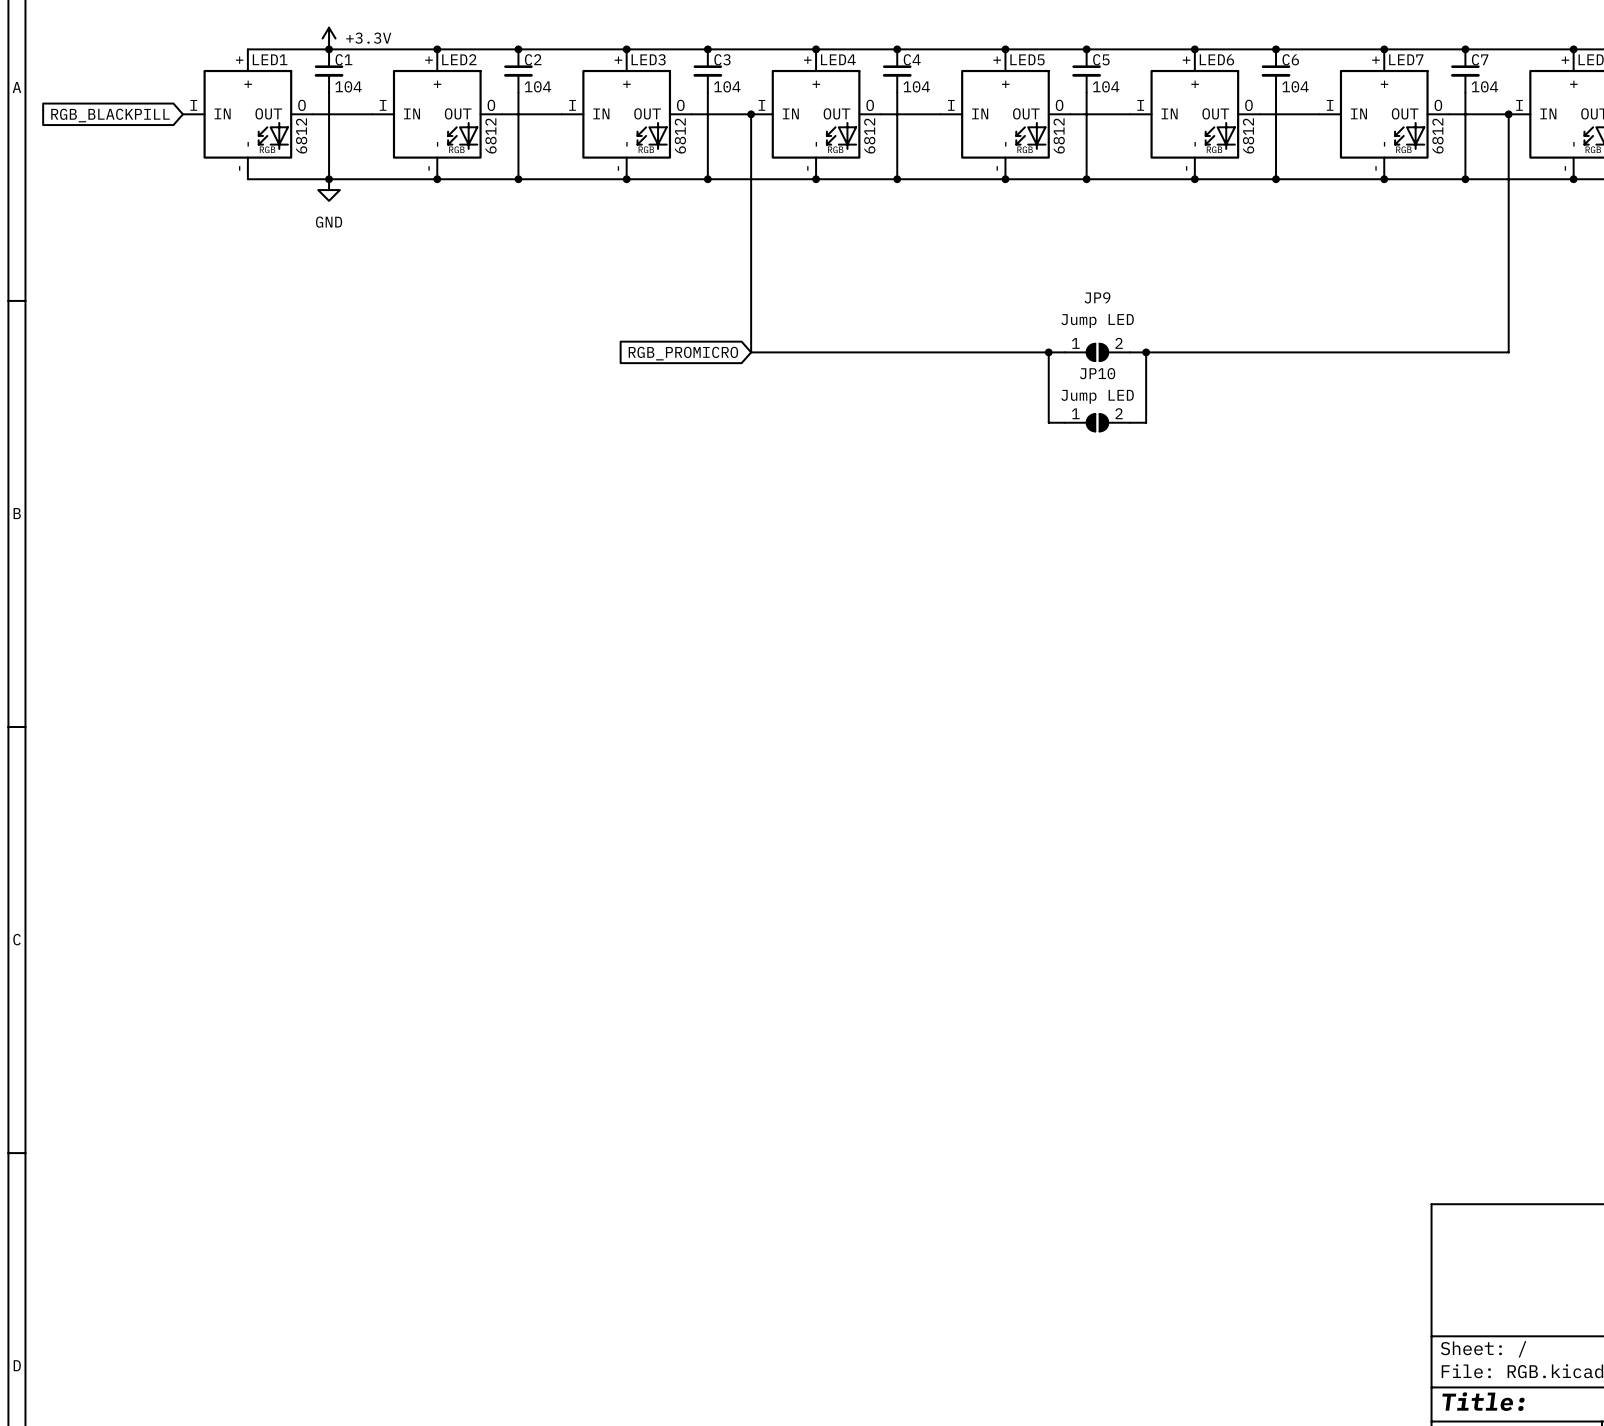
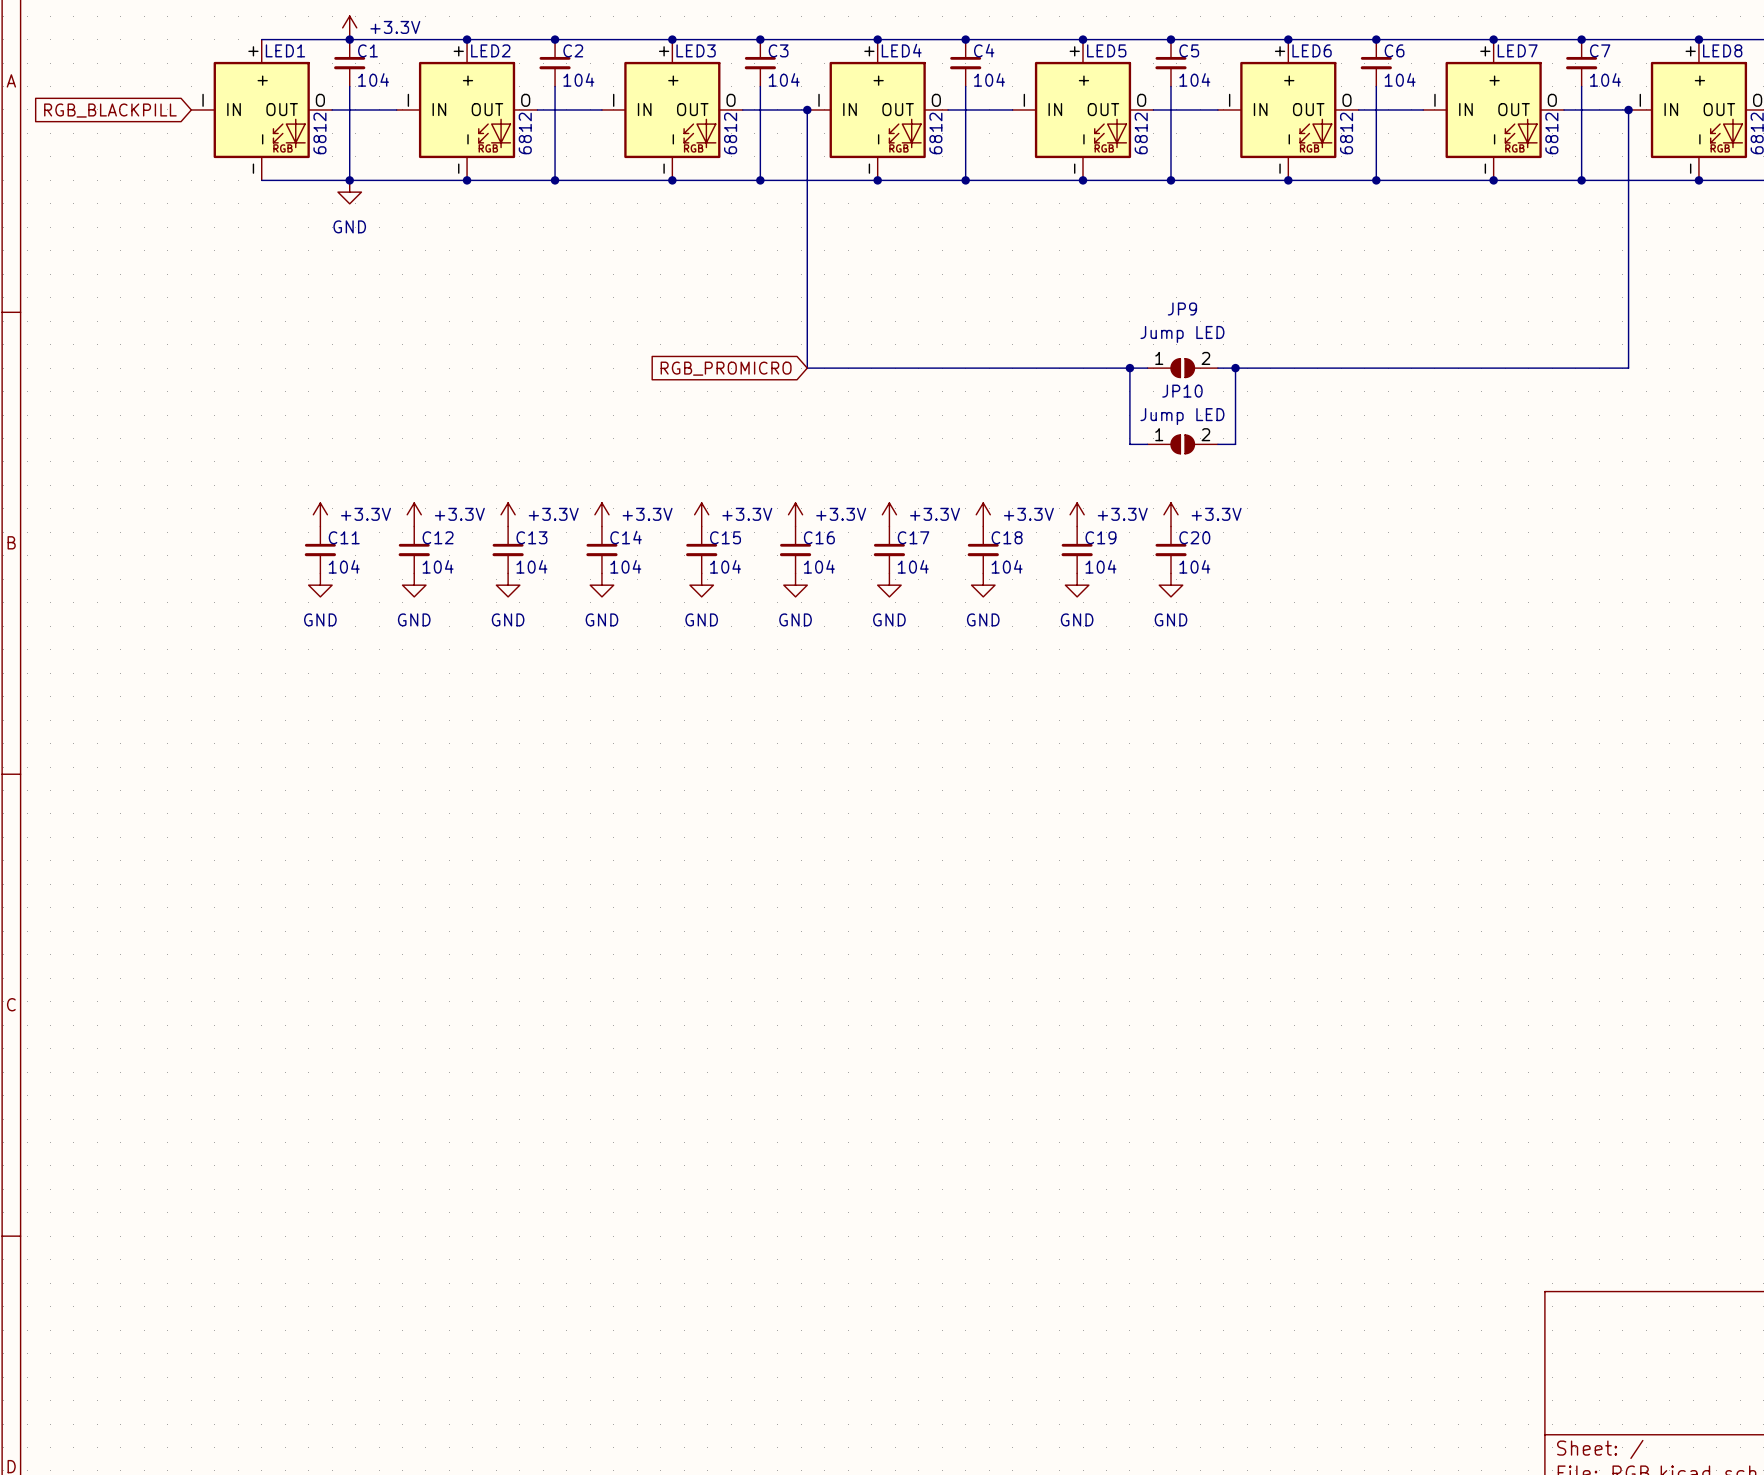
power symbol: none -> +3.3V (320, 514)
power symbol: none -> +3.3V (414, 514)
power symbol: none -> +3.3V (508, 514)
power symbol: none -> +3.3V (601, 514)
power symbol: none -> +3.3V (701, 514)
power symbol: none -> +3.3V (795, 514)
power symbol: none -> +3.3V (889, 514)
power symbol: none -> +3.3V (983, 514)
power symbol: none -> +3.3V (1077, 514)
power symbol: none -> +3.3V (1170, 514)
C11: none -> 104 (320, 549)
C12: none -> 104 (414, 549)
C13: none -> 104 (508, 549)
C14: none -> 104 (601, 549)
C15: none -> 104 (701, 549)
C16: none -> 104 (795, 549)
C17: none -> 104 (889, 549)
C18: none -> 104 (983, 549)
C19: none -> 104 (1077, 549)
C20: none -> 104 (1170, 549)
power symbol: none -> GND (320, 585)
power symbol: none -> GND (414, 585)
power symbol: none -> GND (508, 585)
power symbol: none -> GND (601, 585)
power symbol: none -> GND (701, 585)
power symbol: none -> GND (795, 585)
power symbol: none -> GND (889, 585)
power symbol: none -> GND (983, 585)
power symbol: none -> GND (1077, 585)
power symbol: none -> GND (1170, 585)

